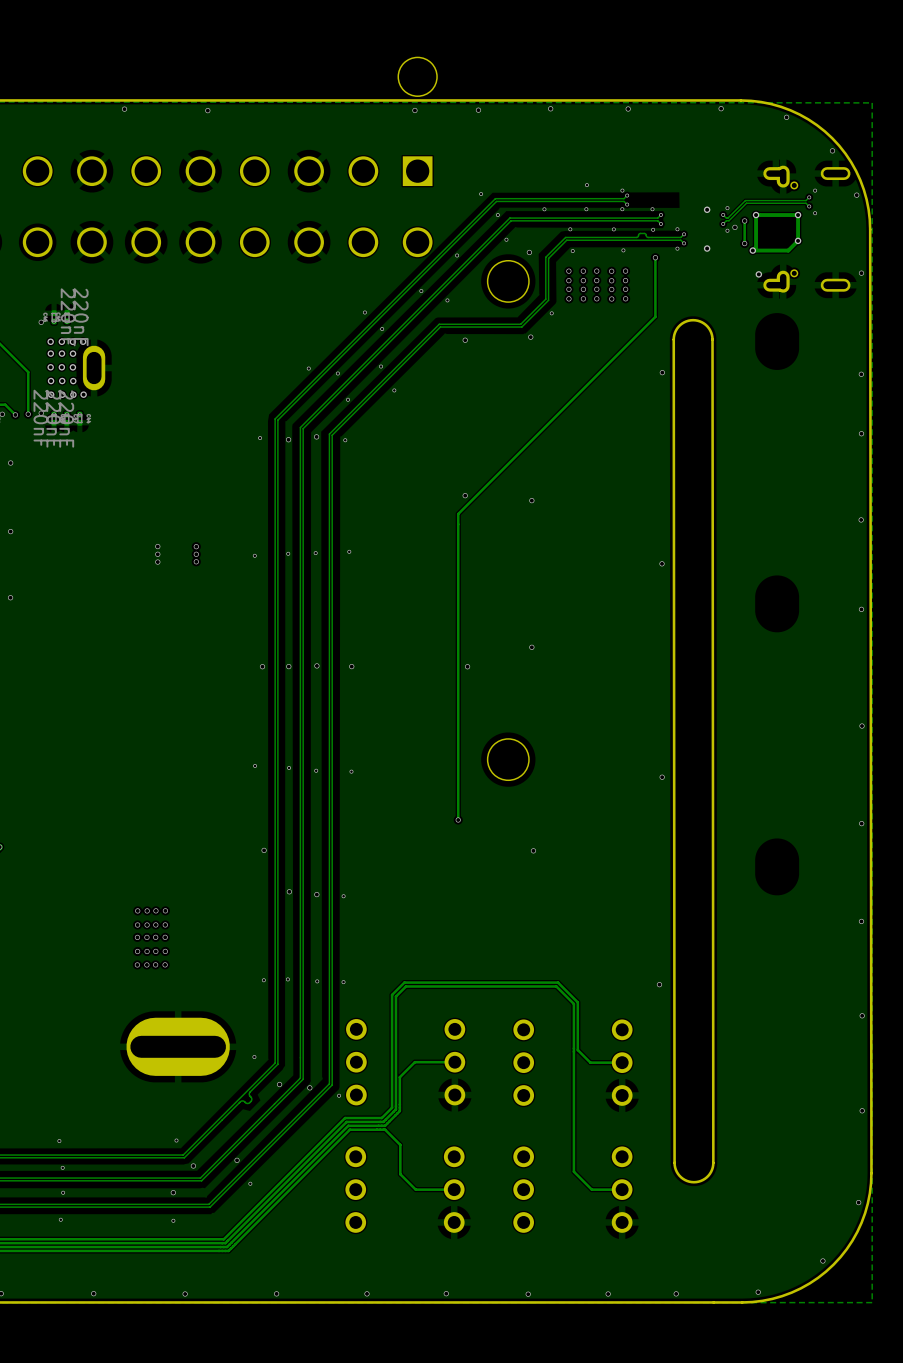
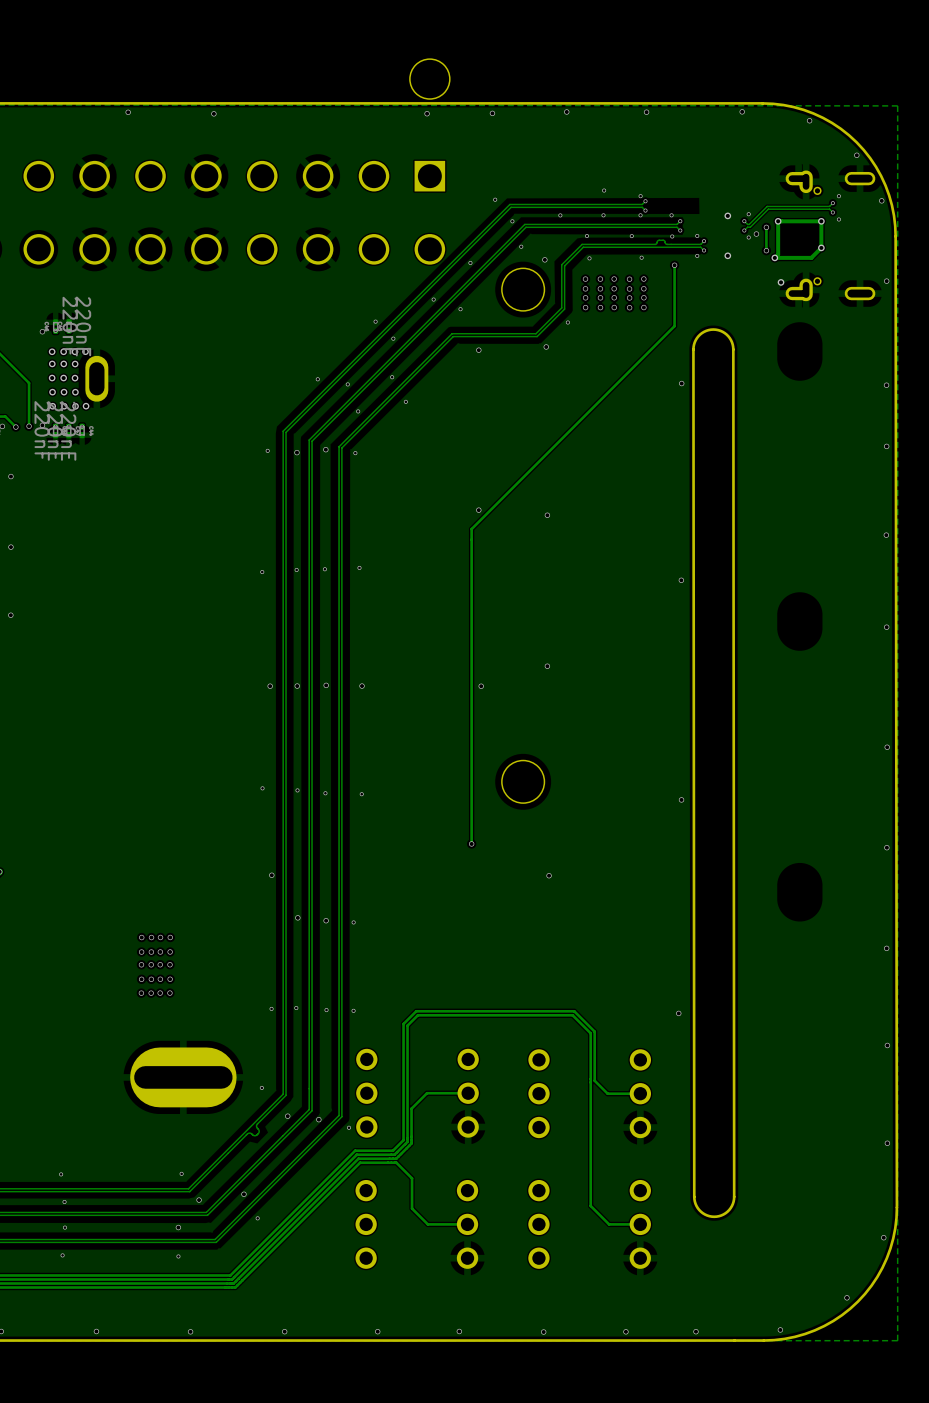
via: (157, 546) -> none
via: (196, 546) -> none
via: (157, 554) -> none
via: (196, 554) -> none
via: (196, 561) -> none
via: (157, 562) -> none

